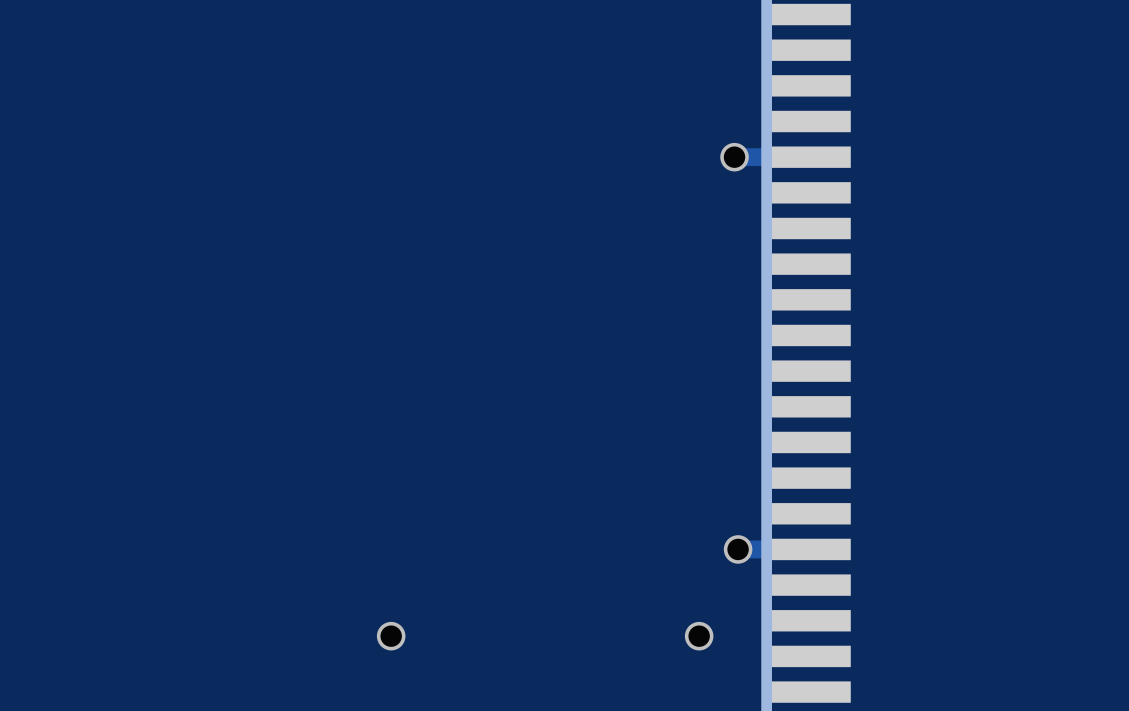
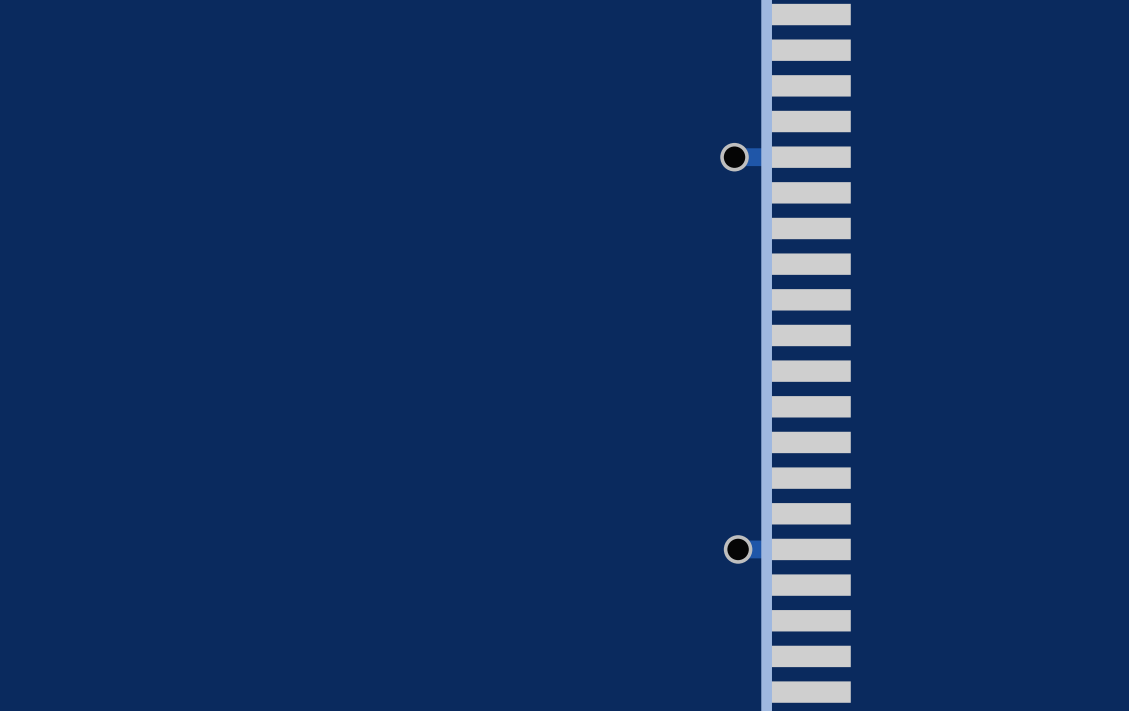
via: (391, 636) -> none
via: (699, 636) -> none

